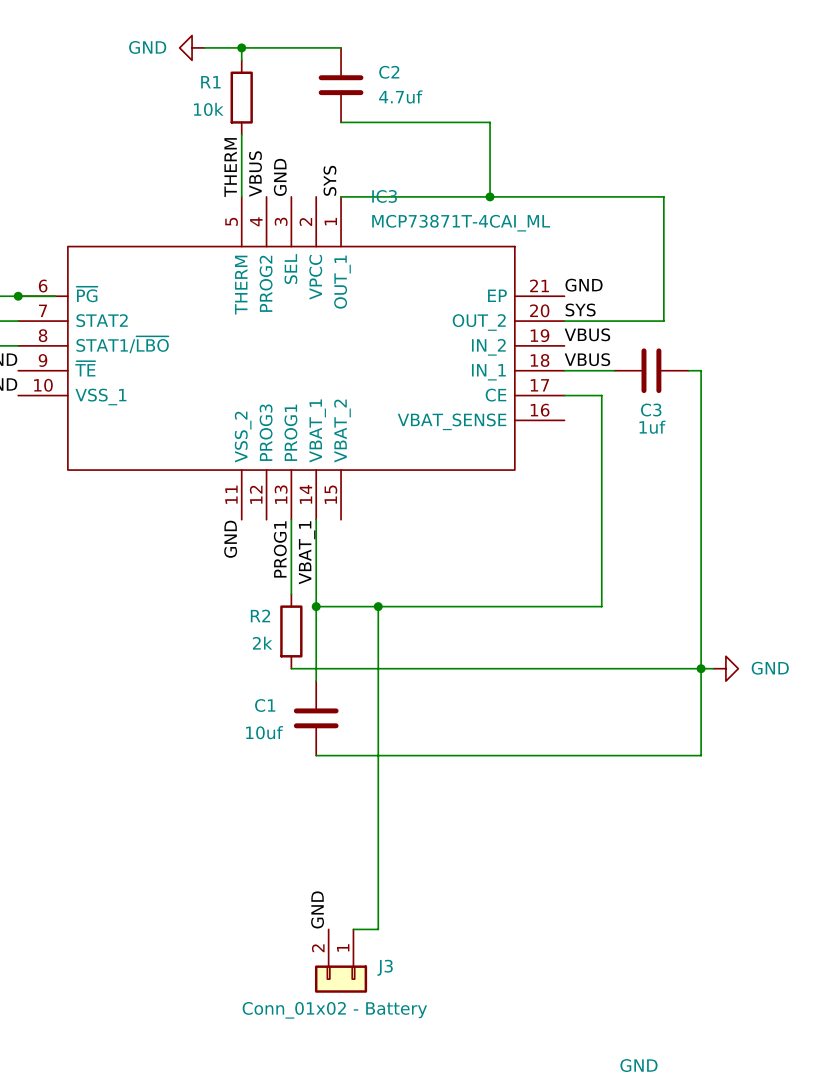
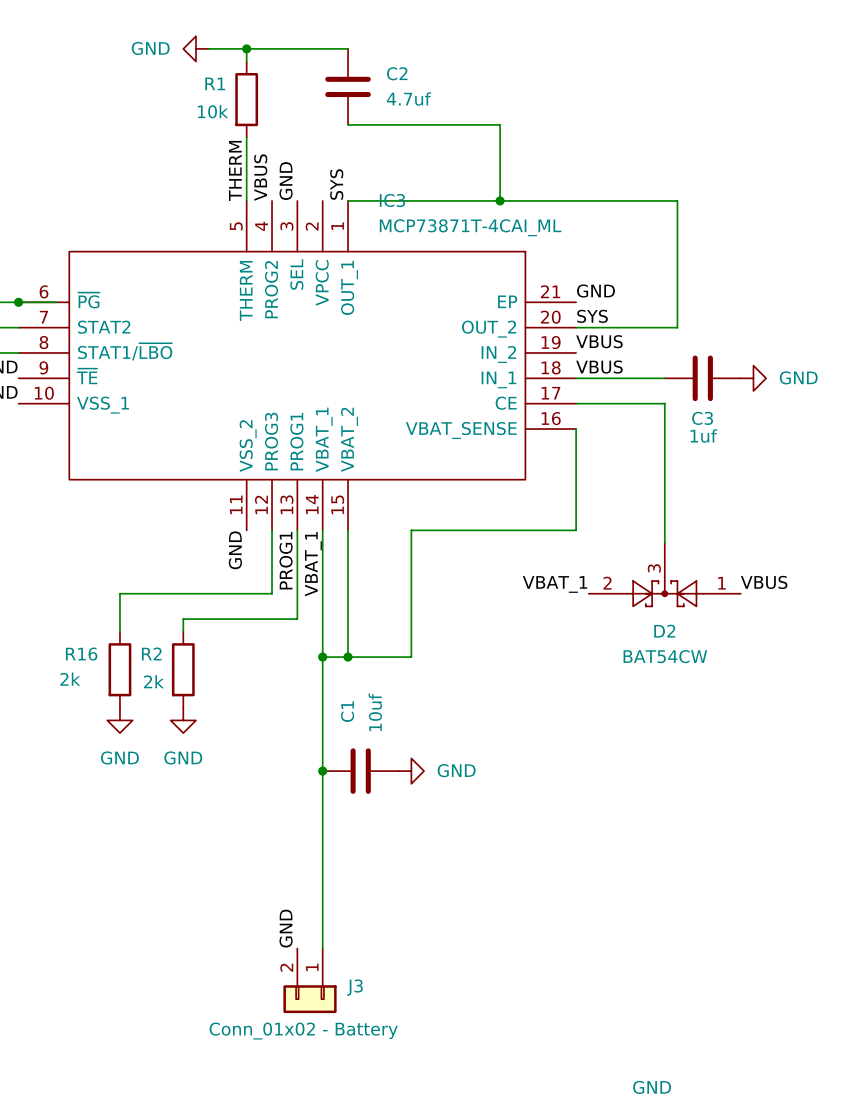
C3 position: (651, 370) -> (702, 378)
wire: (688, 370) (701, 370) (701, 755) (316, 755) -> none
power symbol: none -> GND (753, 378)
wire: (601, 395) (601, 606) (316, 606) -> (614, 403) (664, 403) (664, 543)
wire: none -> (576, 429) (576, 530) (411, 530) (411, 657) (322, 657)
wire: none -> (272, 530) (272, 593) (119, 593) (119, 631)
wire: none -> (348, 530) (348, 657)
D2: none -> BAT54CW (664, 574)
label: none -> VBUS (764, 582)
label: none -> VBAT_1 (555, 584)
wire: none -> (297, 606) (297, 619) (183, 619) (183, 631)
junction: (316, 606) -> none
wire: (378, 606) (378, 929) (353, 929) -> none
junction: (378, 606) -> none
R2 position: (291, 631) -> (183, 669)
junction: none -> (322, 657)
junction: none -> (348, 657)
R16: none -> 2k (119, 669)
wire: (291, 668) (713, 668) -> none
junction: (701, 668) -> none
power symbol: GND (725, 668) -> none
wire: none -> (322, 695) (322, 948)
power symbol: none -> GND (119, 720)
power symbol: none -> GND (183, 720)
C1 name position: C1 (265, 705) -> C1 (347, 711)
C1 rotation: 0° (316, 718) -> 90° clockwise (360, 771)
C1 position: (316, 718) -> (360, 771)
C1 value position: 10uf (264, 732) -> 10uf (375, 712)
junction: none -> (322, 771)
power symbol: none -> GND (411, 771)
label position: GND (317, 909) -> GND (286, 928)
J3 position: (341, 961) -> (310, 980)

